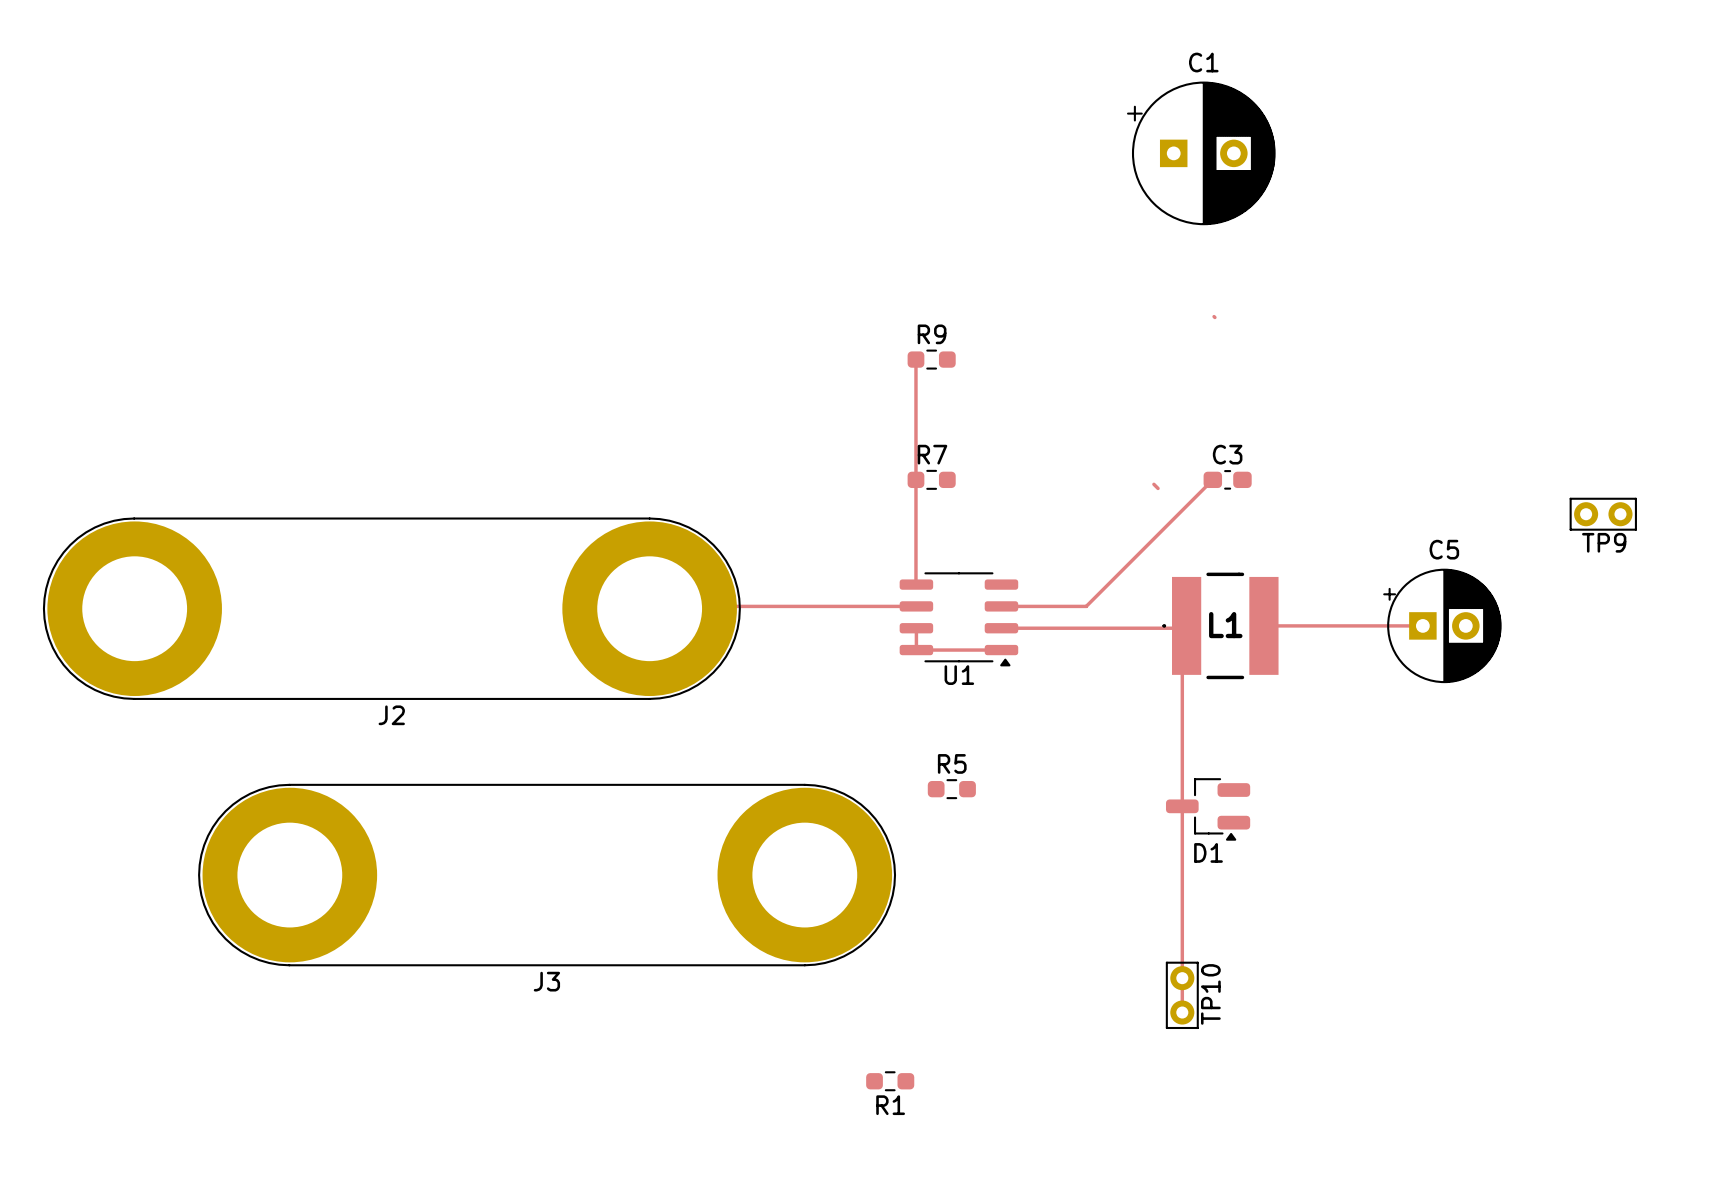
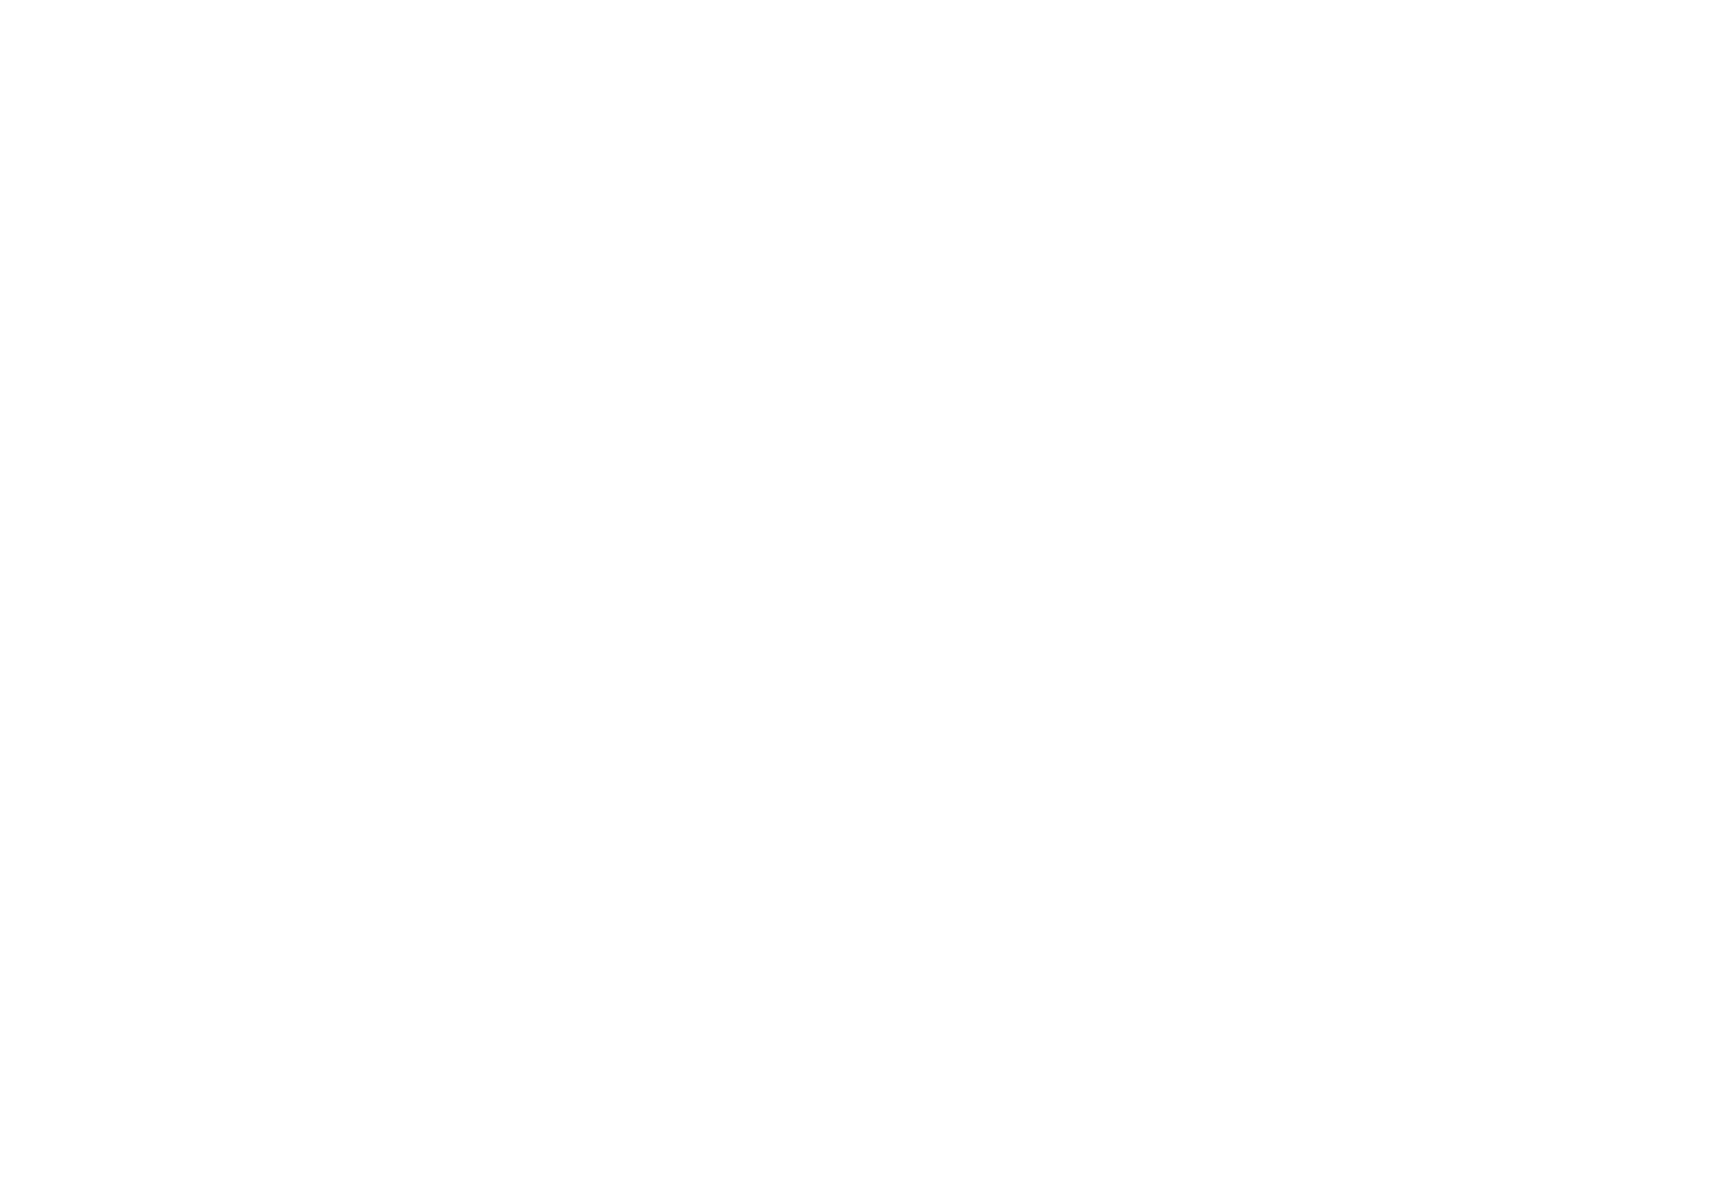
C1: (1201, 153) -> none
track: (1214, 316) (1214, 317) -> none
track: (915, 359) (916, 584) -> none
R9: (931, 359) -> none
R7: (931, 479) -> none
track: (1212, 479) (1086, 606) (1001, 606) (1003, 608) -> none
C3: (1227, 479) -> none
track: (1153, 484) (1158, 488) -> none
TP9: (1603, 514) -> none
track: (916, 606) (651, 606) (649, 608) -> none
J2: (391, 608) -> none
U1: (958, 619) -> none
track: (1186, 625) (1182, 630) (1182, 1012) -> none
L1: (1220, 625) -> none
track: (1263, 625) (1422, 625) -> none
C5: (1442, 625) -> none
track: (916, 628) (916, 650) (1001, 650) -> none
track: (1001, 628) (1184, 628) -> none
R5: (951, 789) -> none
D1: (1208, 809) -> none
J3: (547, 875) -> none
TP10: (1182, 995) -> none
R1: (890, 1081) -> none

